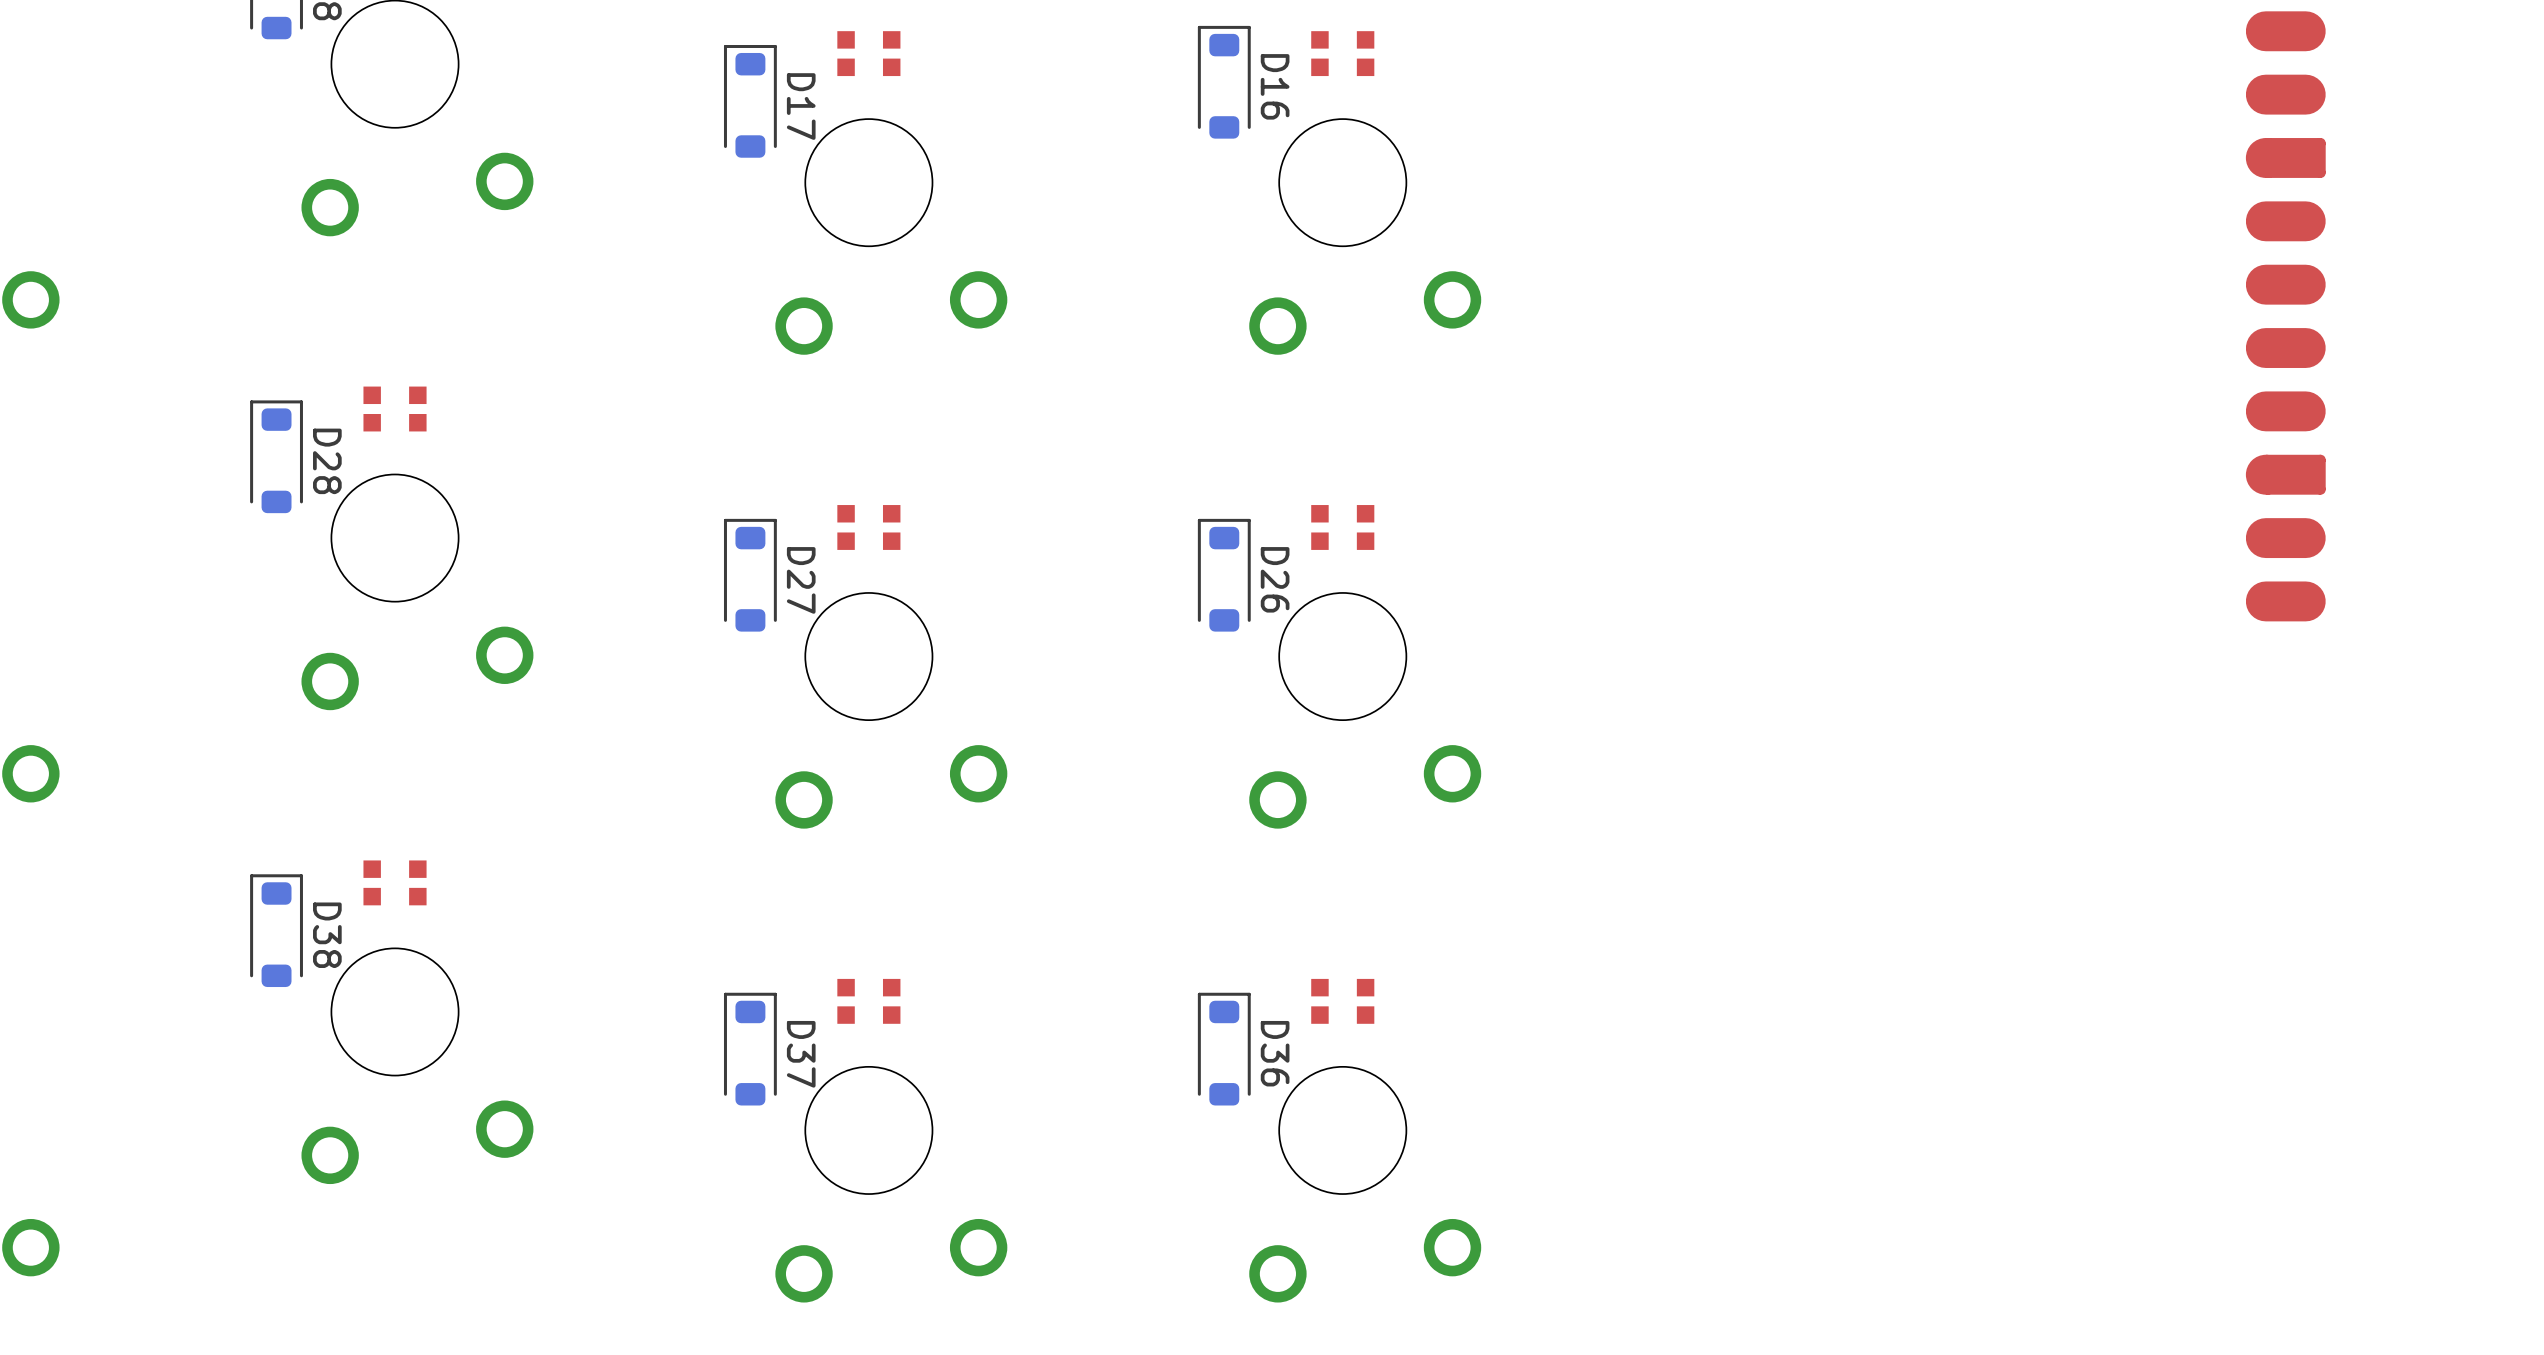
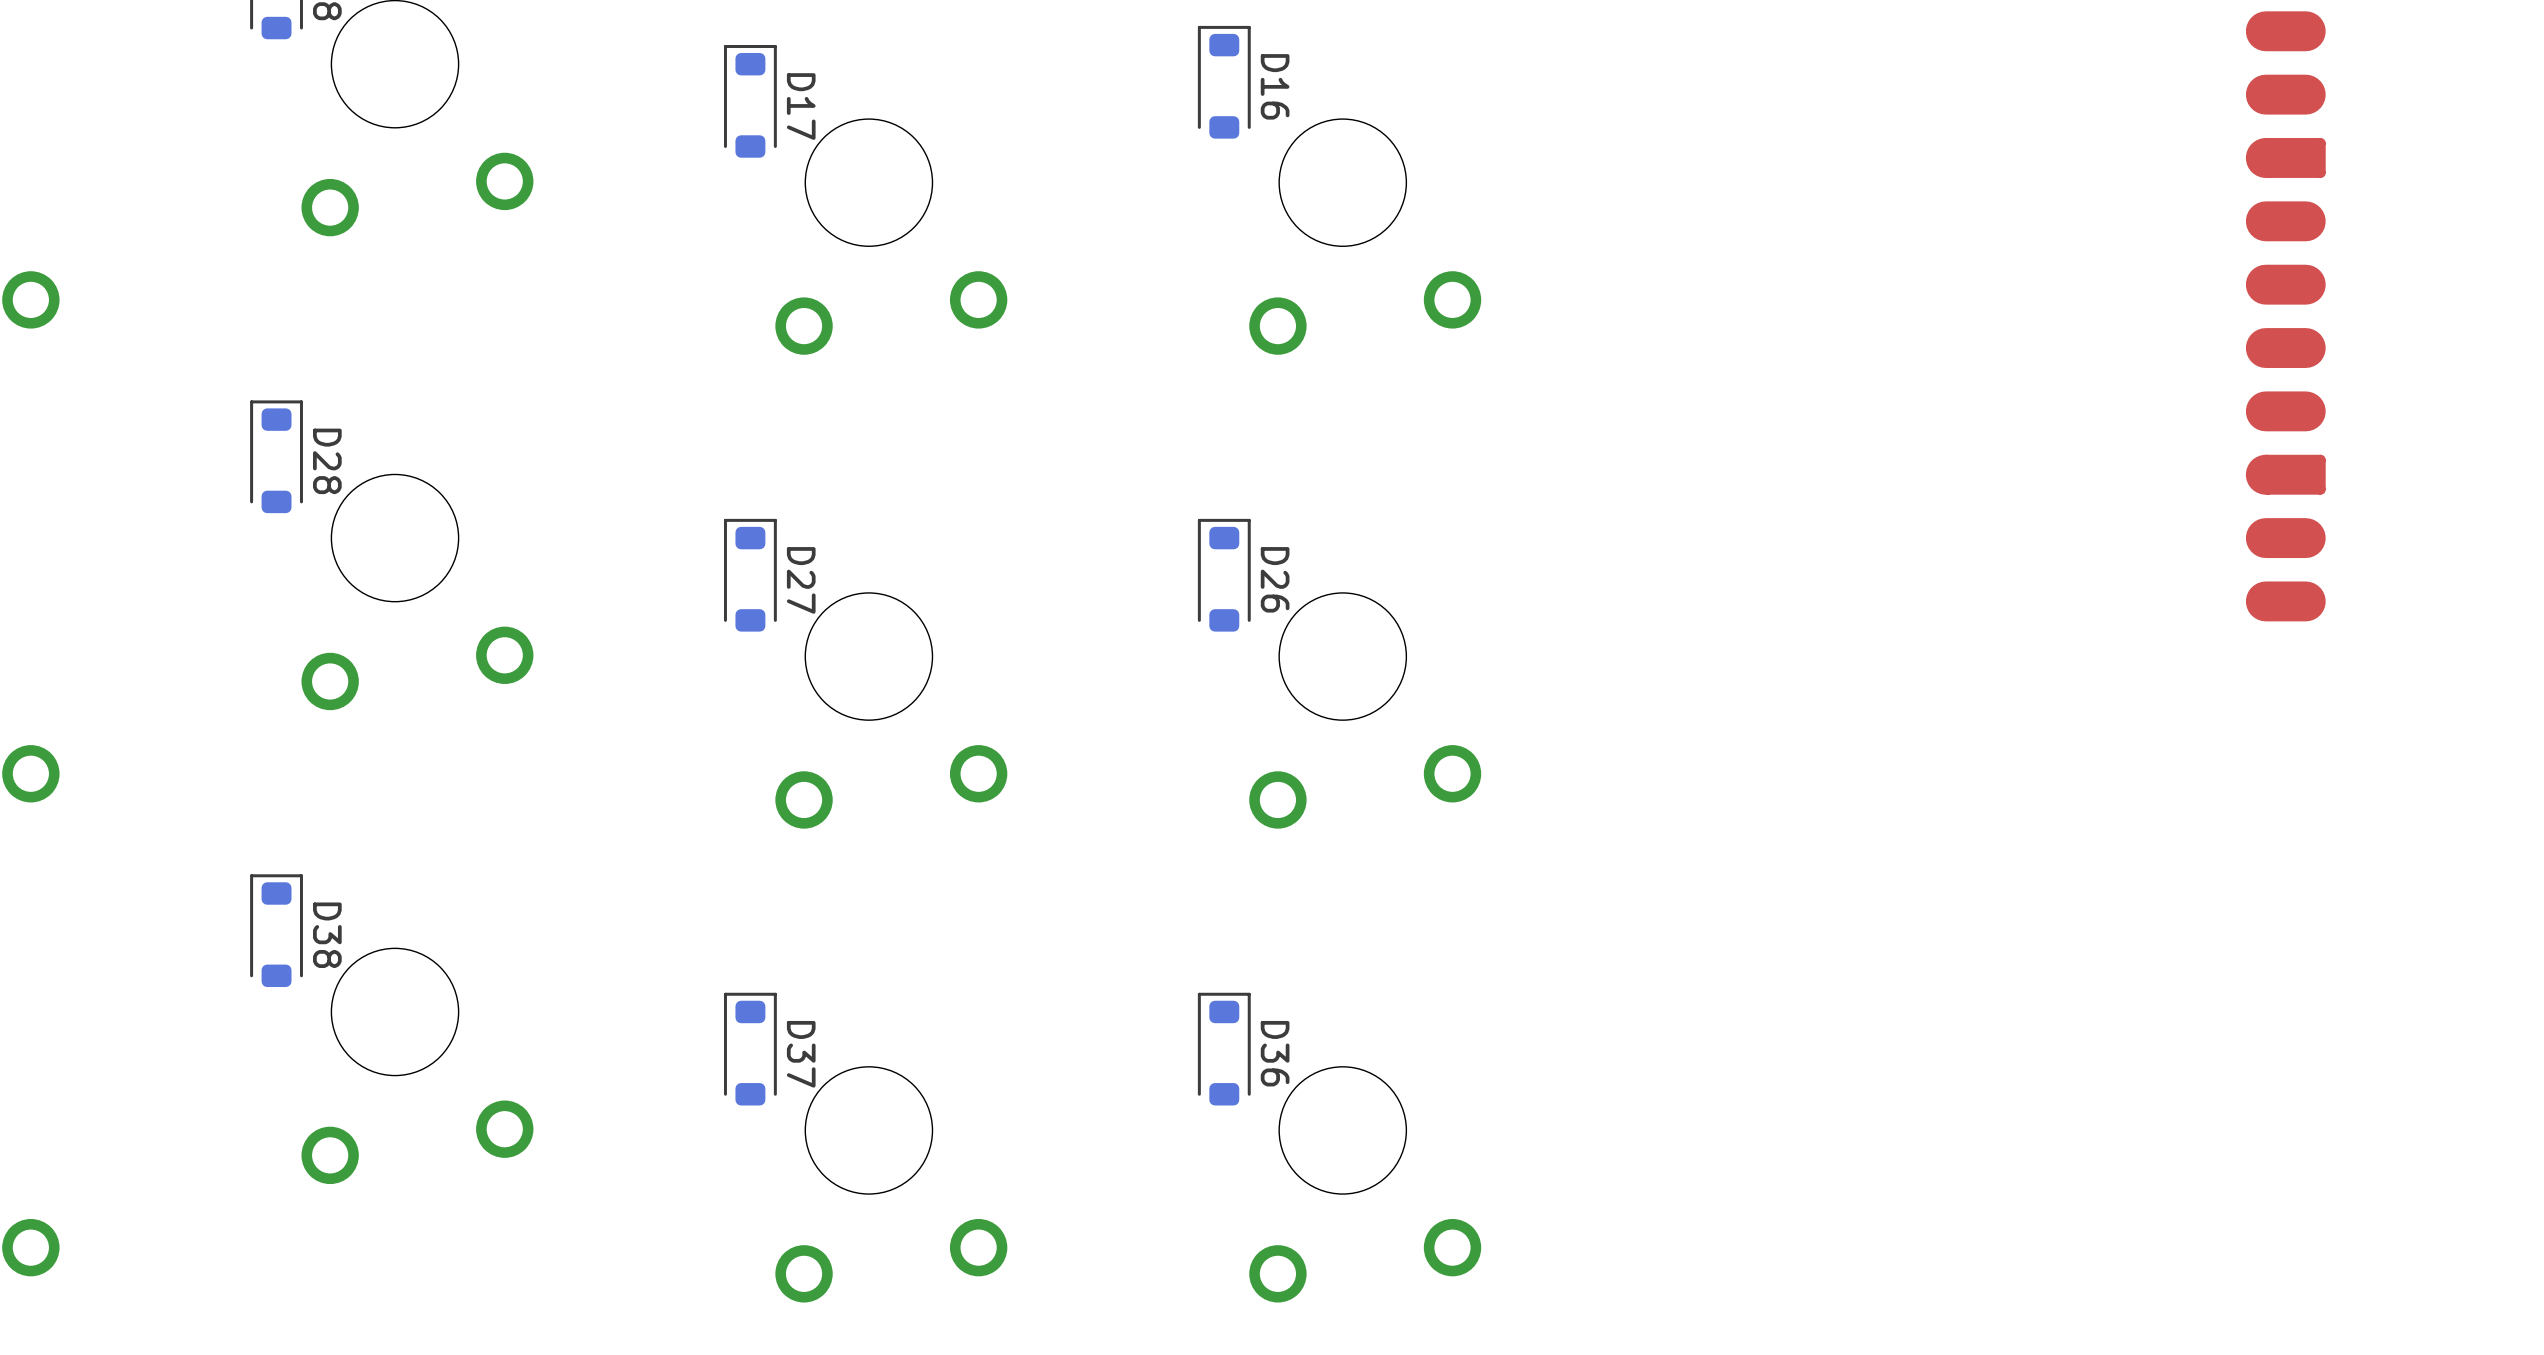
part: (868, 53) -> none
part: (1342, 53) -> none
part: (395, 409) -> none
part: (868, 527) -> none
part: (1342, 527) -> none
part: (395, 882) -> none
part: (868, 1001) -> none
part: (1342, 1001) -> none

